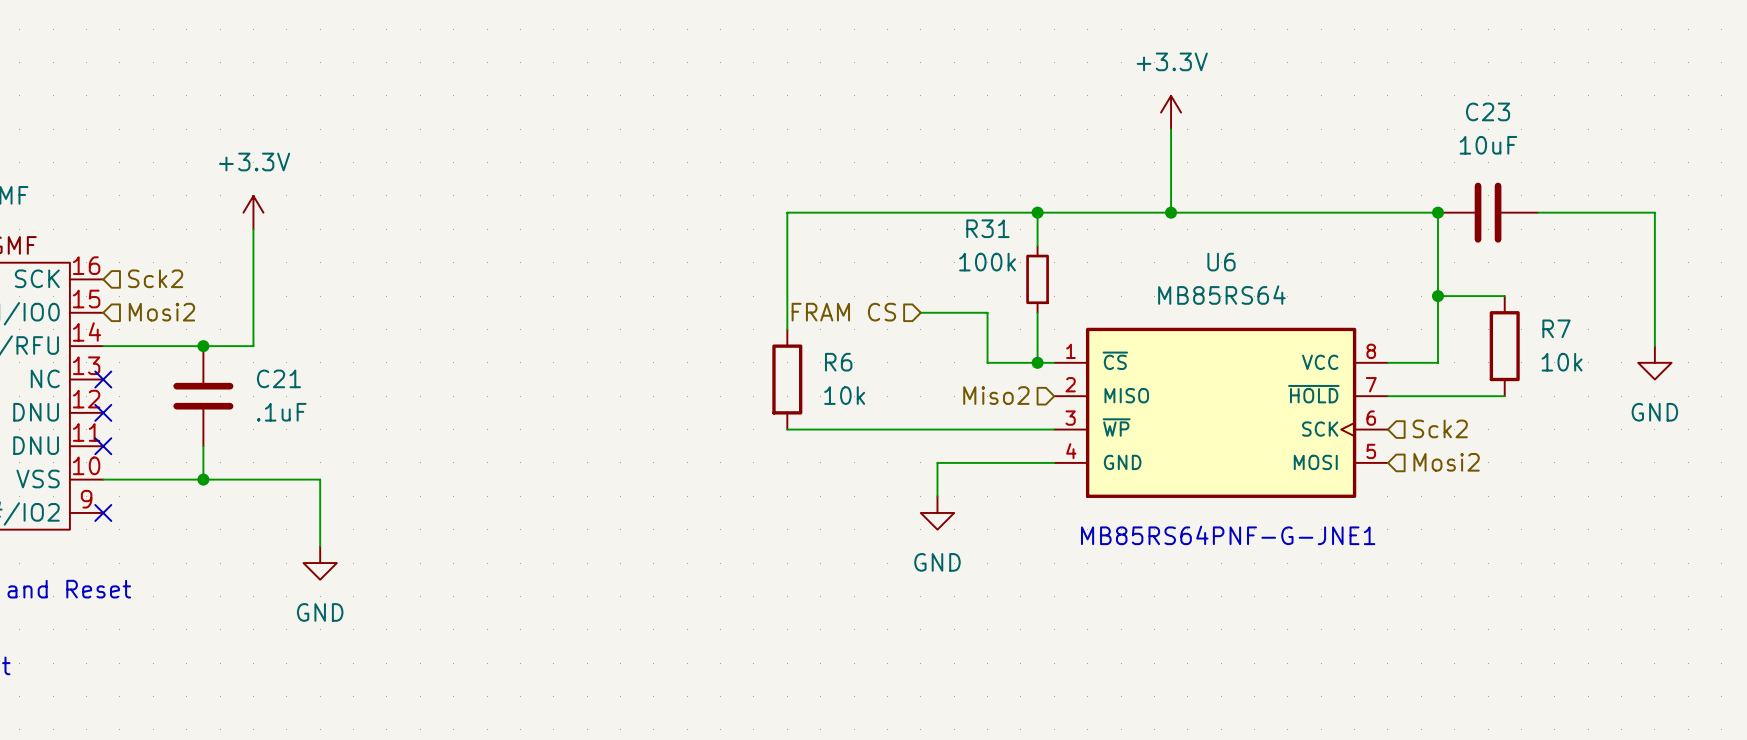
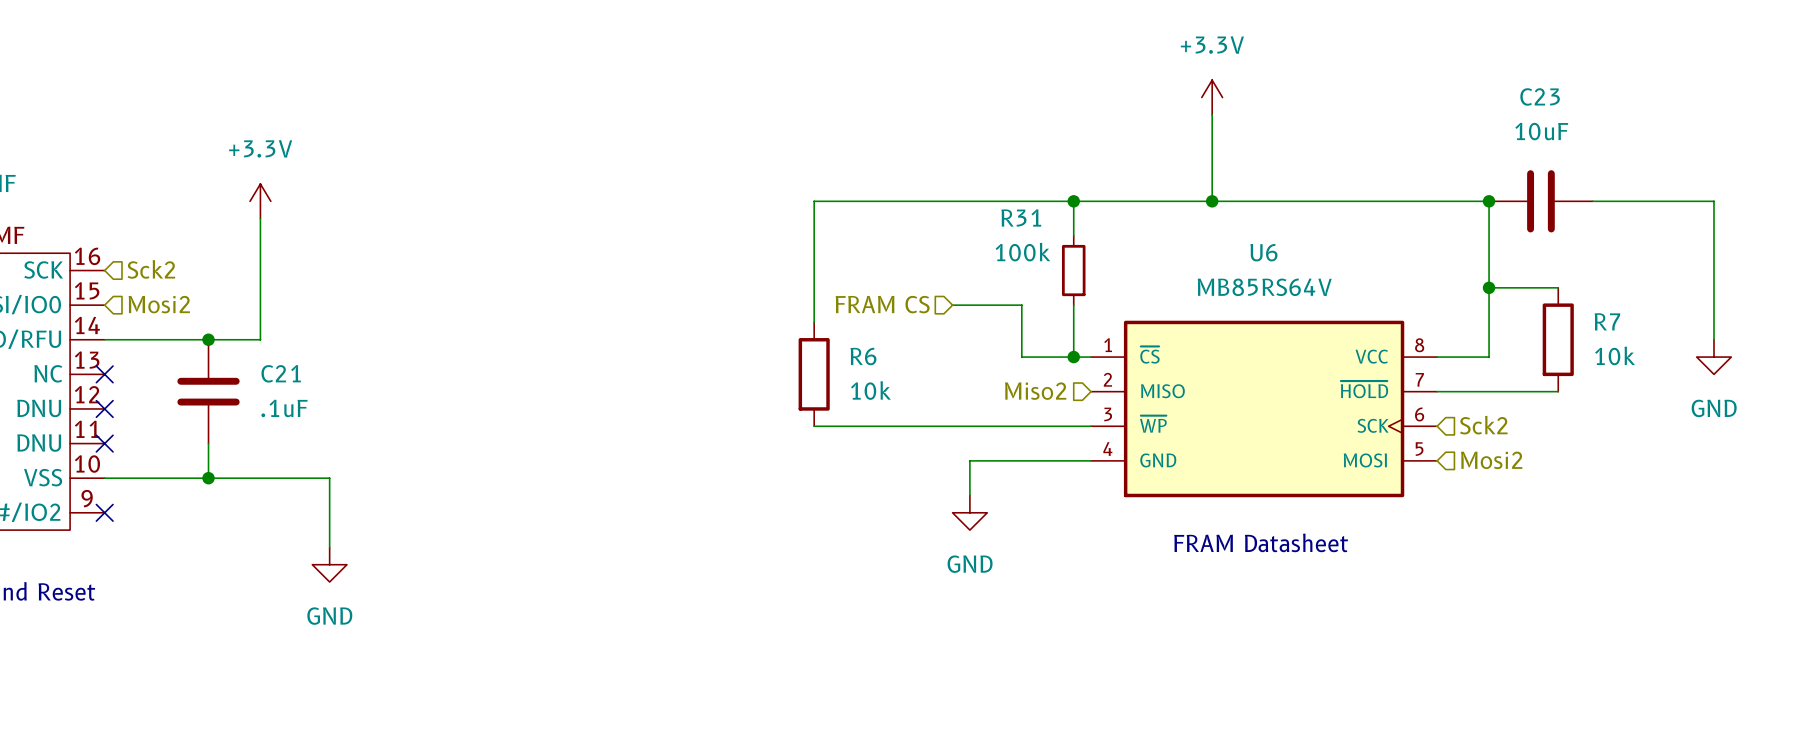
U6 value: MB85RS64 (1221, 295) -> MB85RS64V (1264, 287)
text: MB85RS64PNF-G-JNE1 (1228, 535) -> FRAM Datasheet (1261, 542)

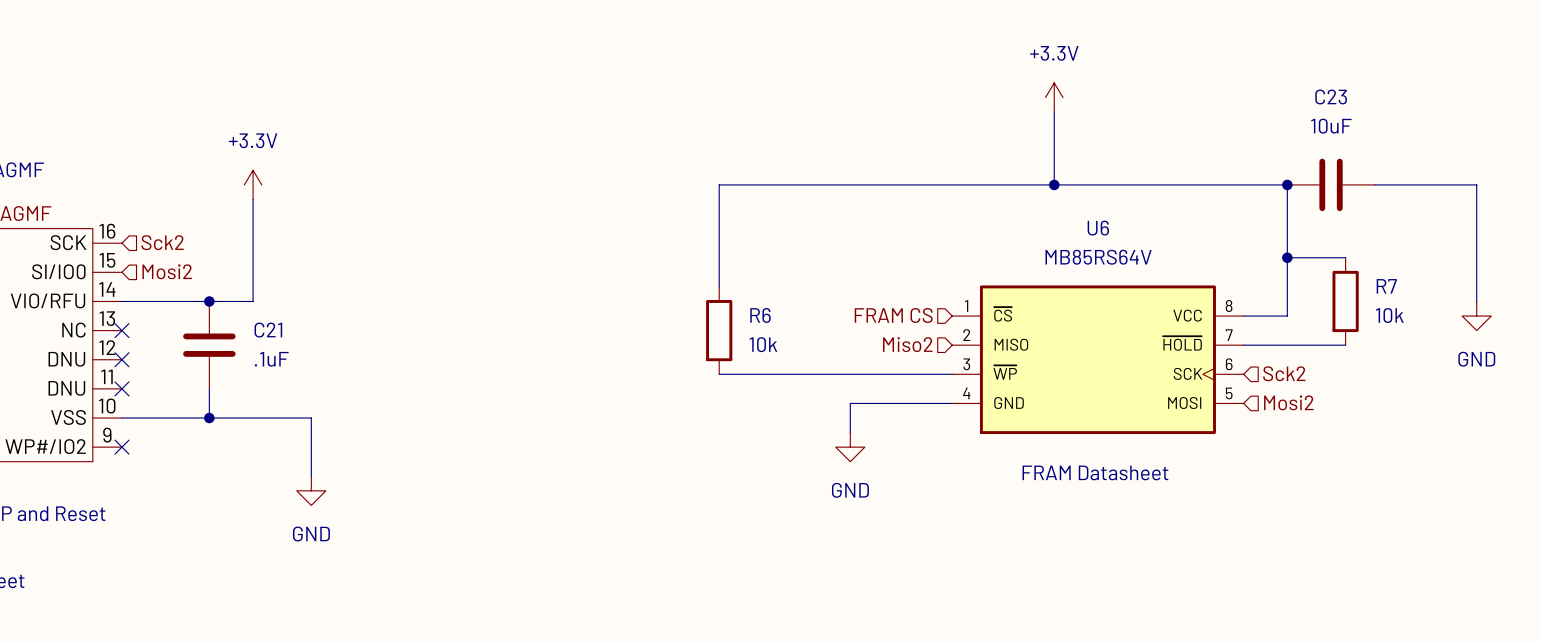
wire: (1073, 201) (1073, 235) -> none
junction: (1073, 201) -> none
R31: 100k (1073, 270) -> none
hierarchical label position: FRAM CS (882, 304) -> FRAM CS (893, 315)
wire: (952, 305) (1021, 305) (1021, 357) (1091, 357) -> none
wire: (1073, 305) (1073, 357) -> none
junction: (1073, 357) -> none

